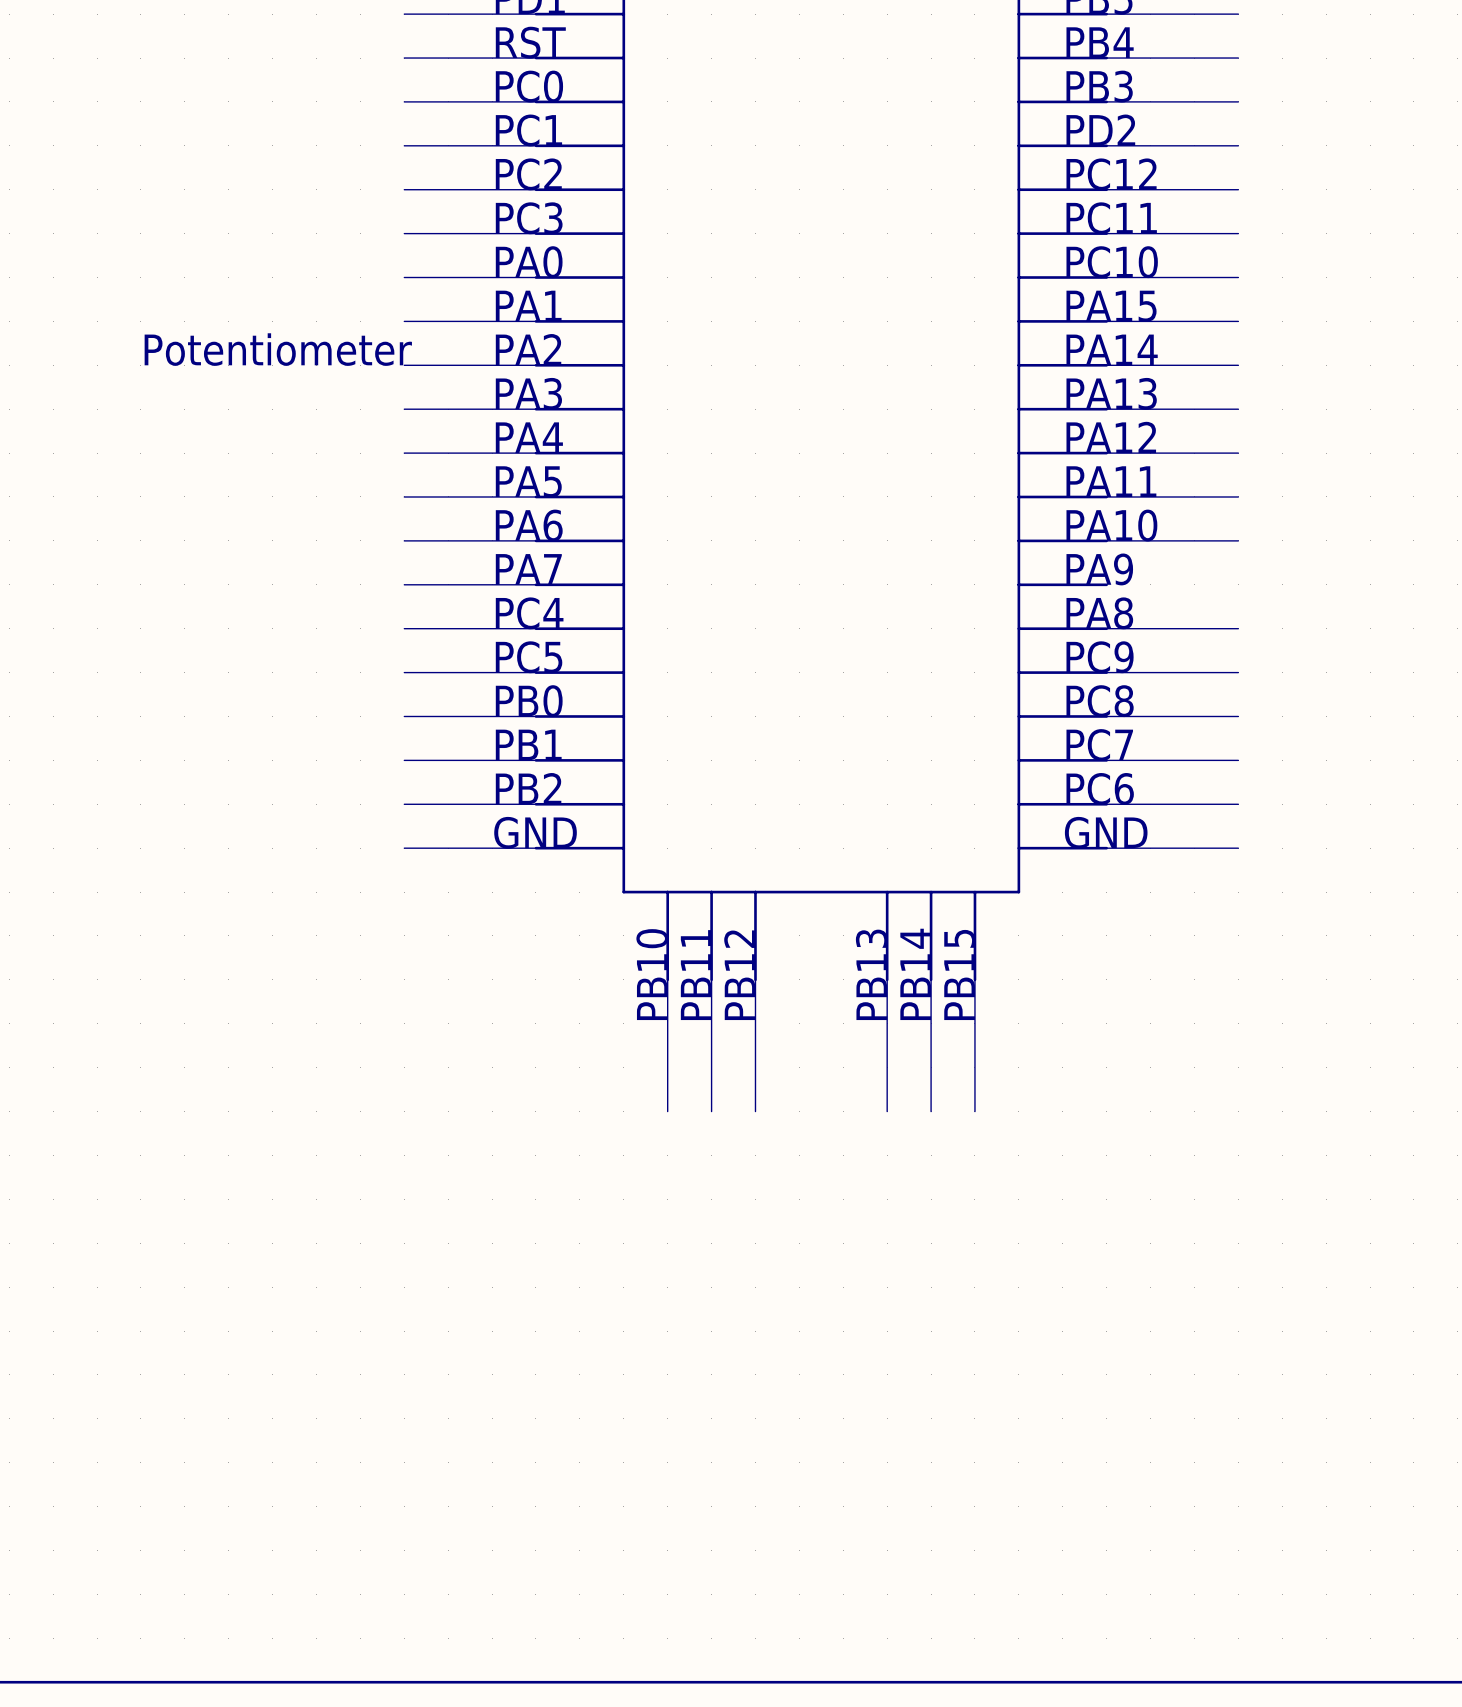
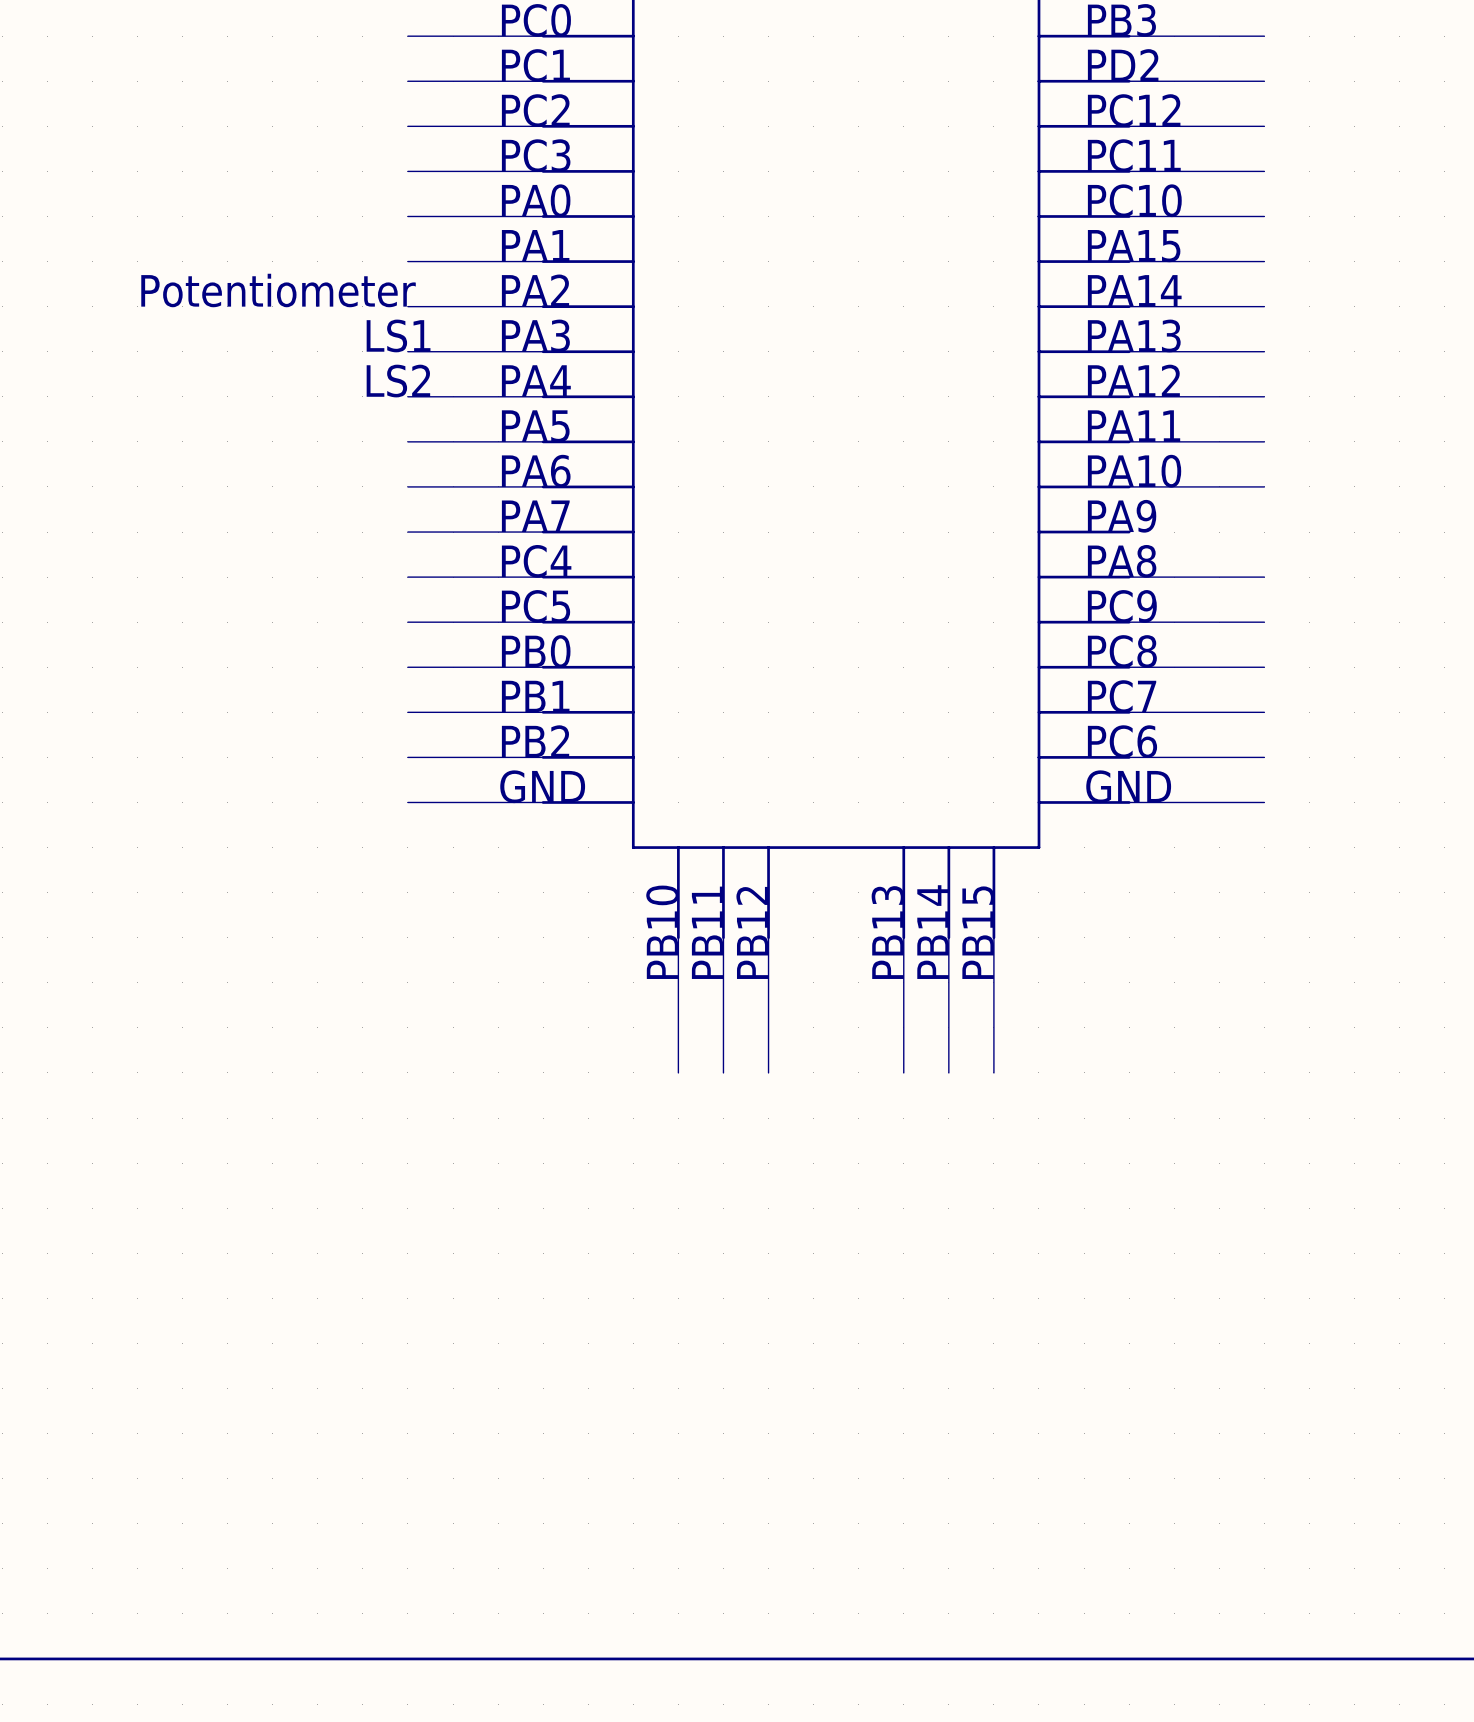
text: none -> LS1 (398, 335)
text: none -> LS2 (398, 381)

